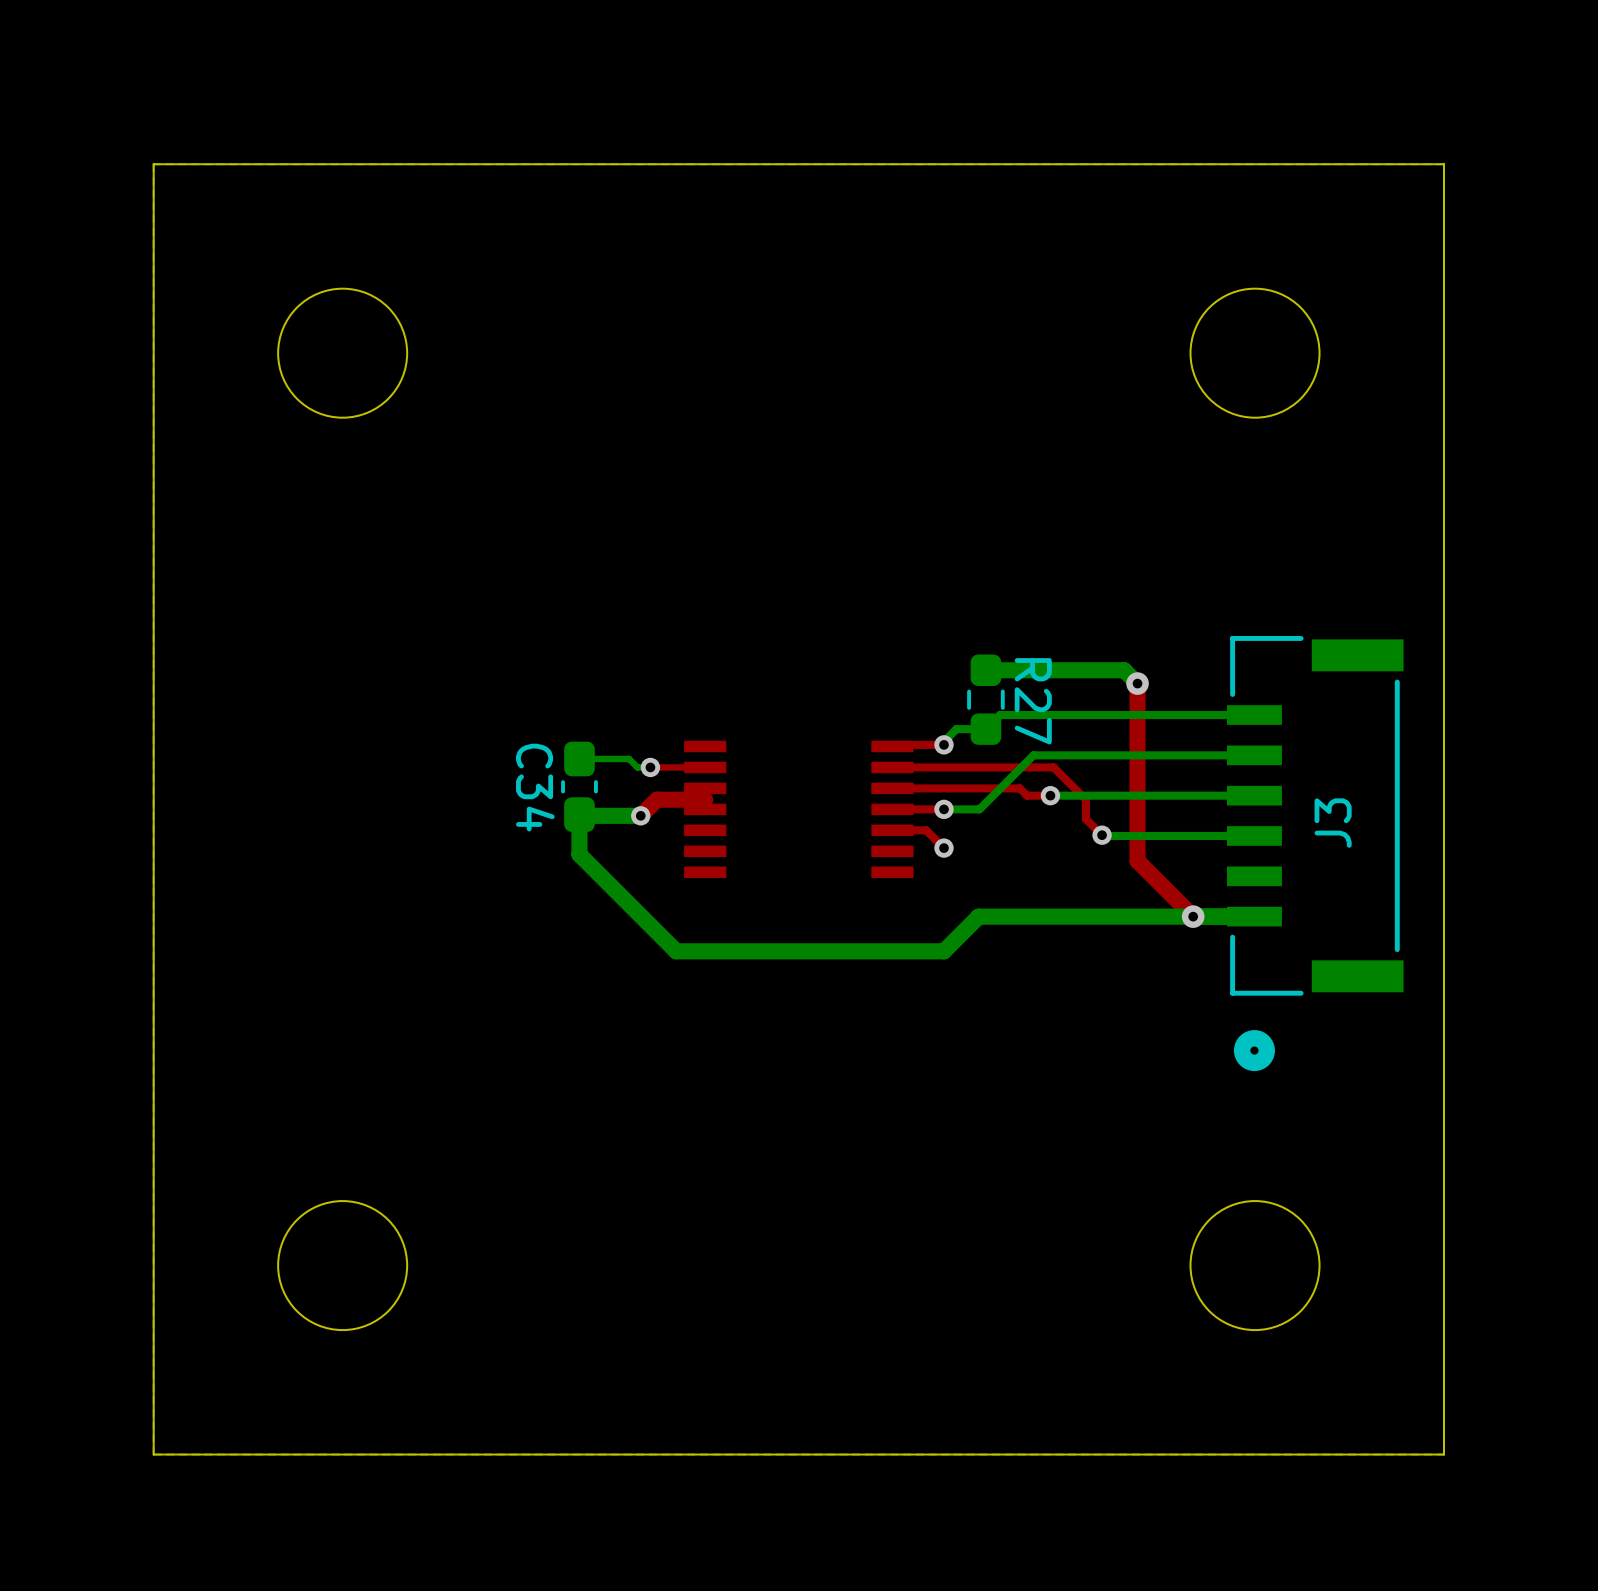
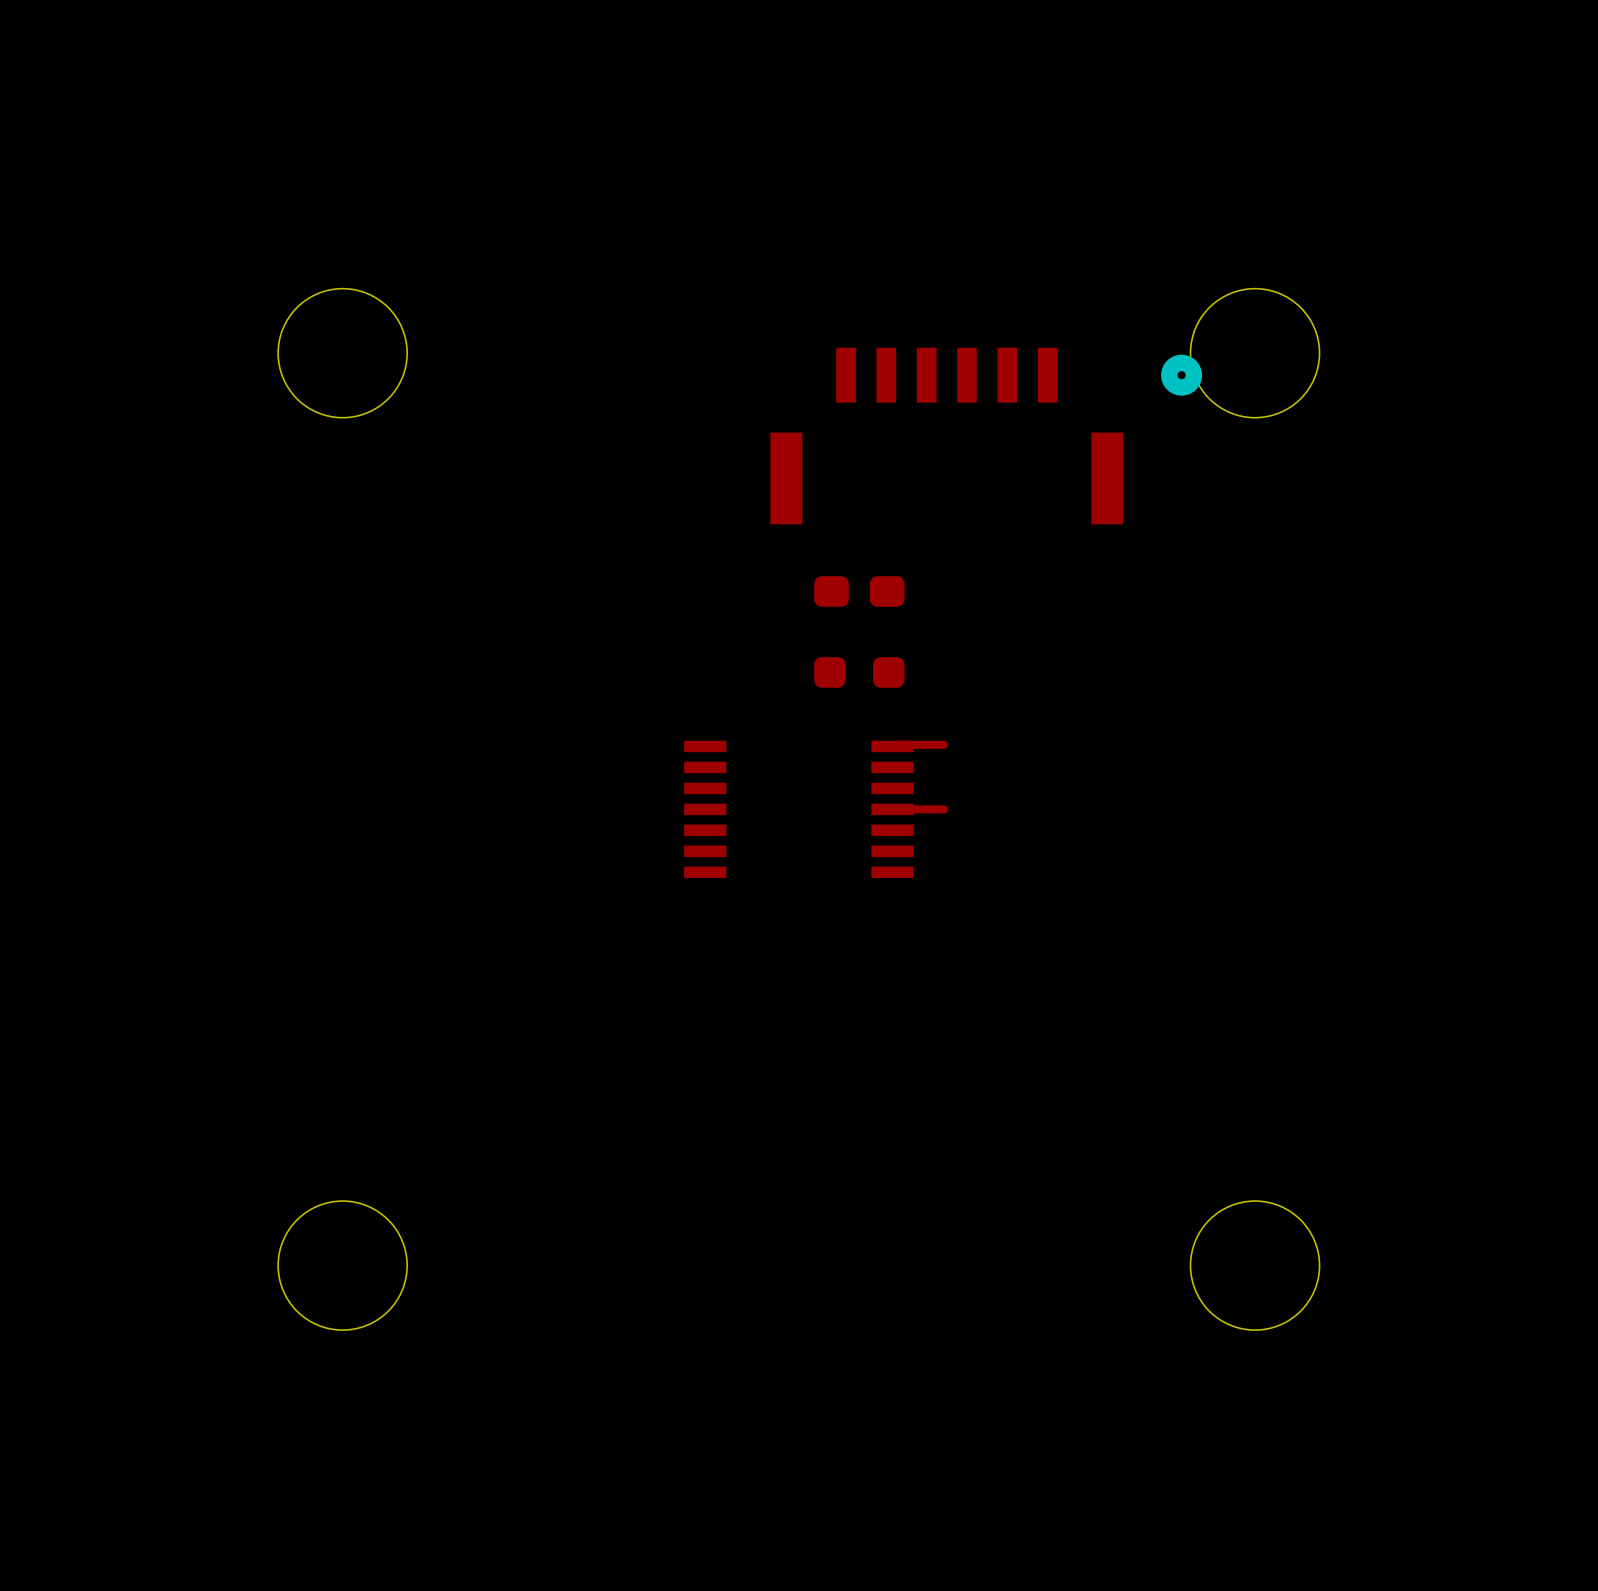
board edge: (1443, 164) (153, 164) (153, 1454) (1443, 1454) (1443, 164) -> none
bottom track: (985, 670) (1124, 670) (1137, 683) -> none
top track: (1137, 683) (1137, 860) (1193, 916) -> none
via: (1137, 683) -> none
R27 side: bottom (985, 699) -> top (859, 672)
bottom track: (1254, 715) (1000, 715) (985, 729) (956, 729) (943, 741) (943, 744) -> none
via: (943, 744) -> none
bottom track: (1254, 755) (1033, 755) (979, 809) (943, 809) -> none
bottom track: (579, 758) (629, 758) (637, 767) (650, 767) -> none
via: (650, 767) -> none
top track: (705, 767) (650, 767) -> none
top track: (892, 767) (1053, 767) (1085, 799) (1085, 819) (1102, 835) -> none
C34 side: bottom (579, 786) -> top (859, 591)
top track: (892, 788) (1019, 788) (1027, 795) (1050, 795) -> none
via: (1050, 795) -> none
bottom track: (1254, 795) (1050, 795) -> none
top track: (705, 799) (656, 799) (640, 815) -> none
via: (943, 809) -> none
bottom track: (640, 815) (579, 814) (579, 854) (676, 951) (943, 951) (978, 916) (1254, 916) -> none
via: (640, 815) -> none
top track: (892, 830) (926, 830) (943, 848) -> none
bottom track: (1102, 835) (1254, 835) -> none
via: (1102, 835) -> none
via: (943, 848) -> none
J3 side: bottom (1315, 853) -> top (986, 436)
via: (1193, 916) -> none

